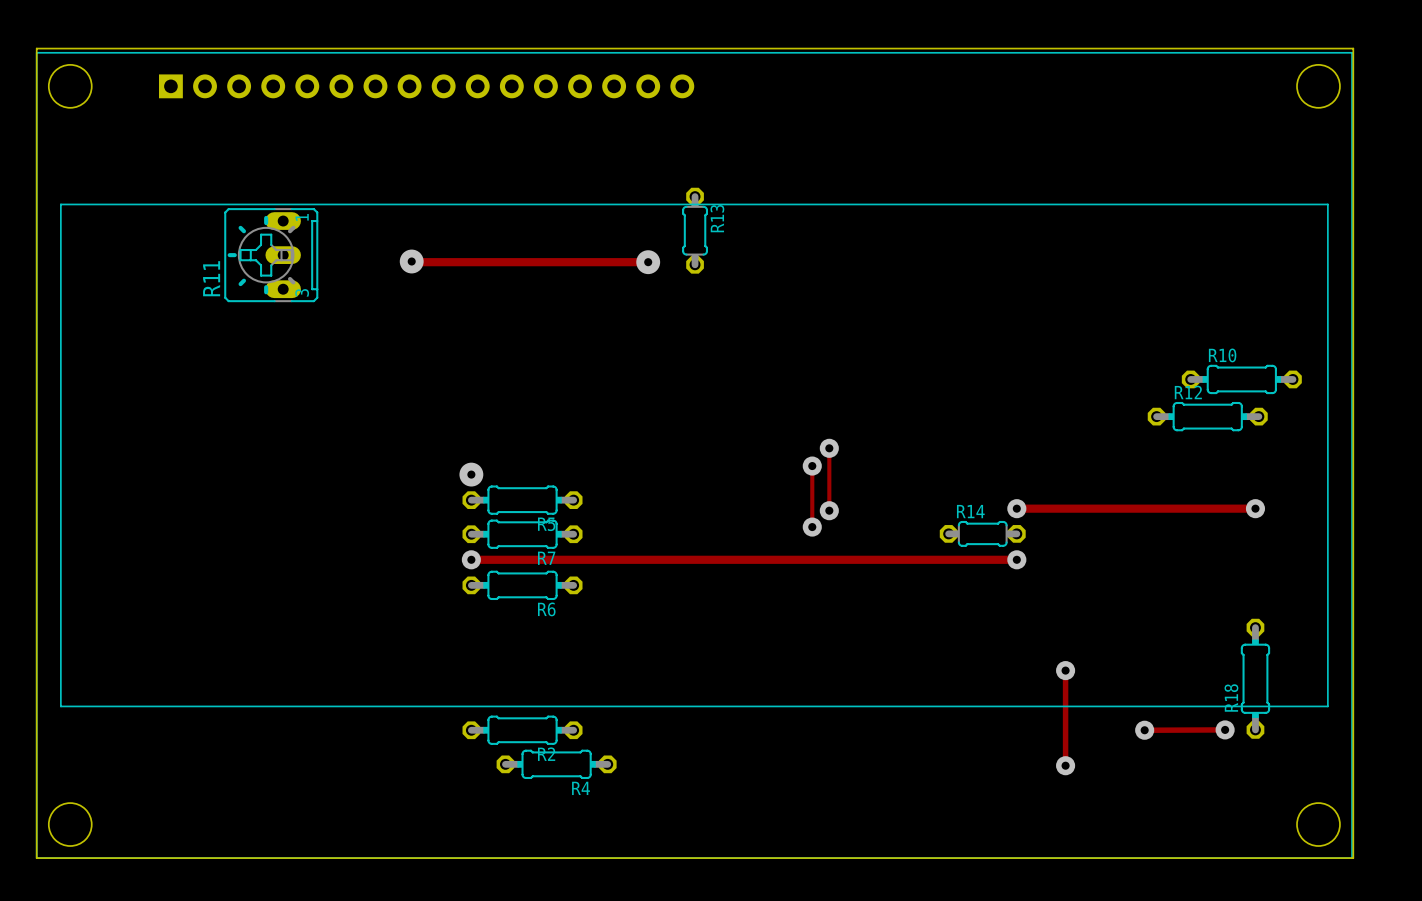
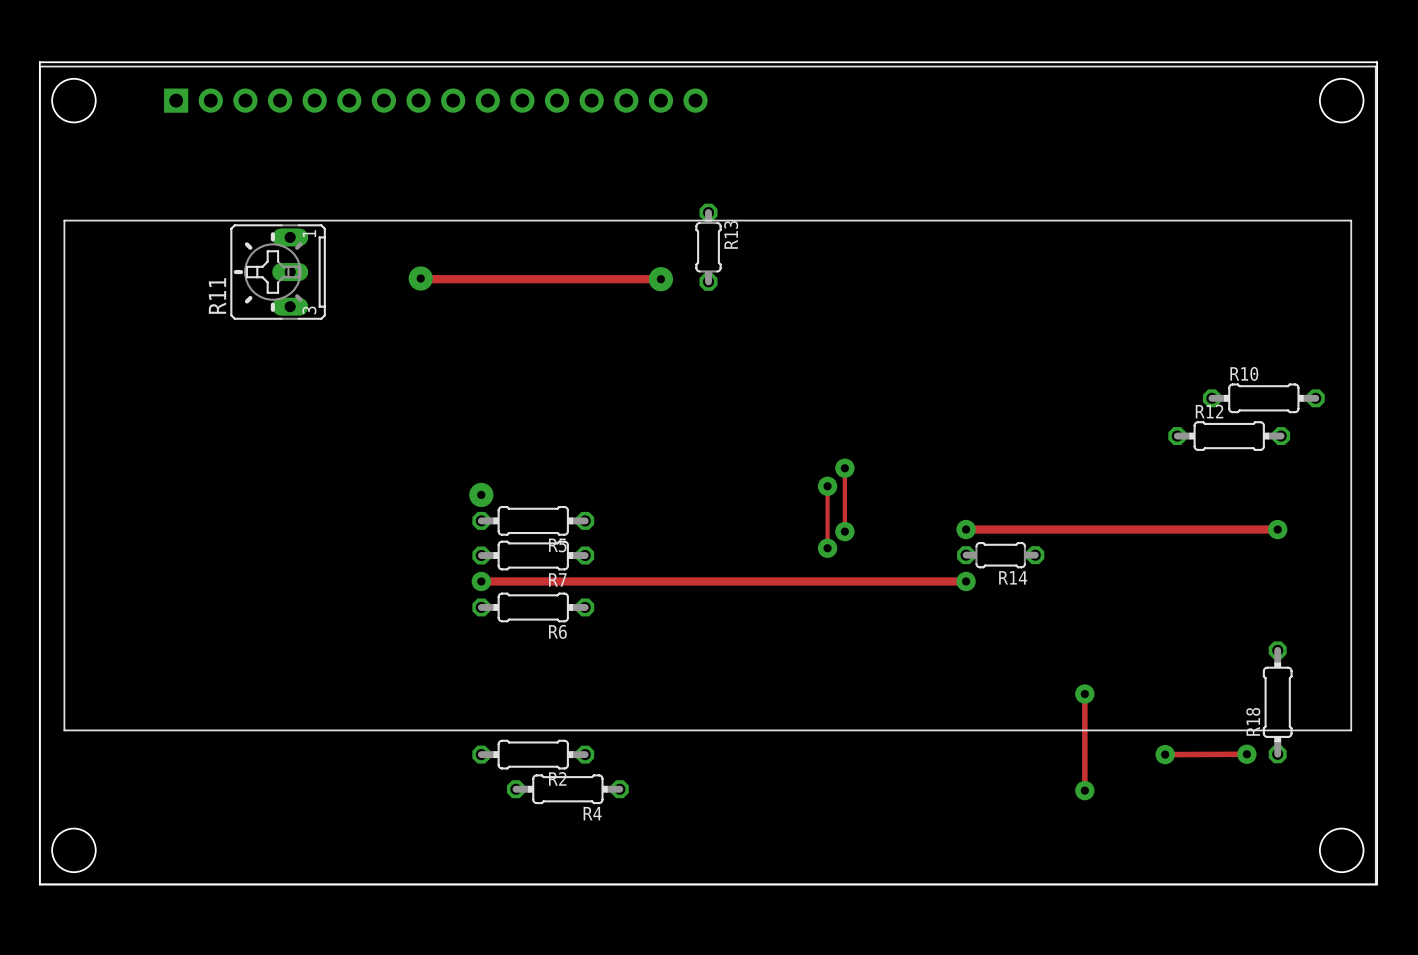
via: none -> (966, 529)
via: (1016, 508) -> none
R14 name position: R14 (970, 511) -> R14 (1013, 577)
track: (948, 559) (1016, 559) -> (966, 529) (1035, 529)
via: none -> (966, 581)
via: (1016, 559) -> none

